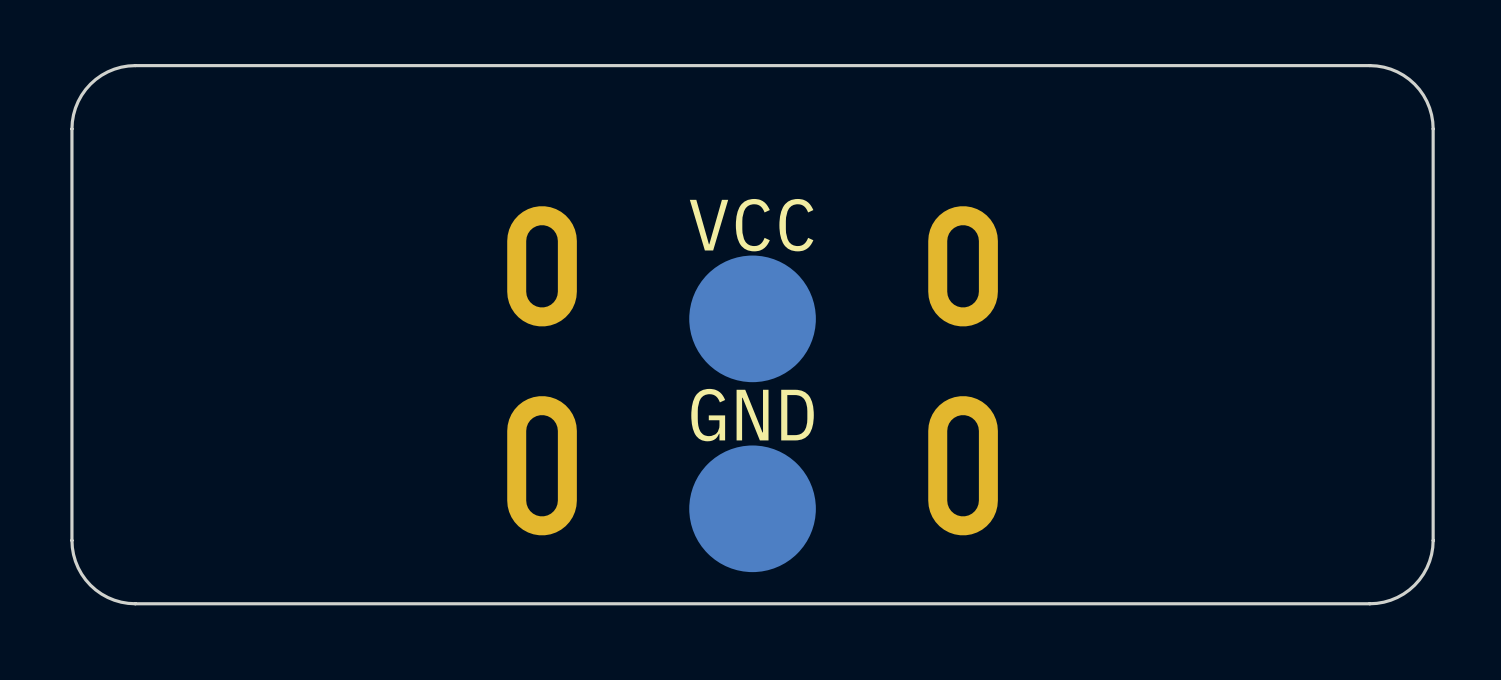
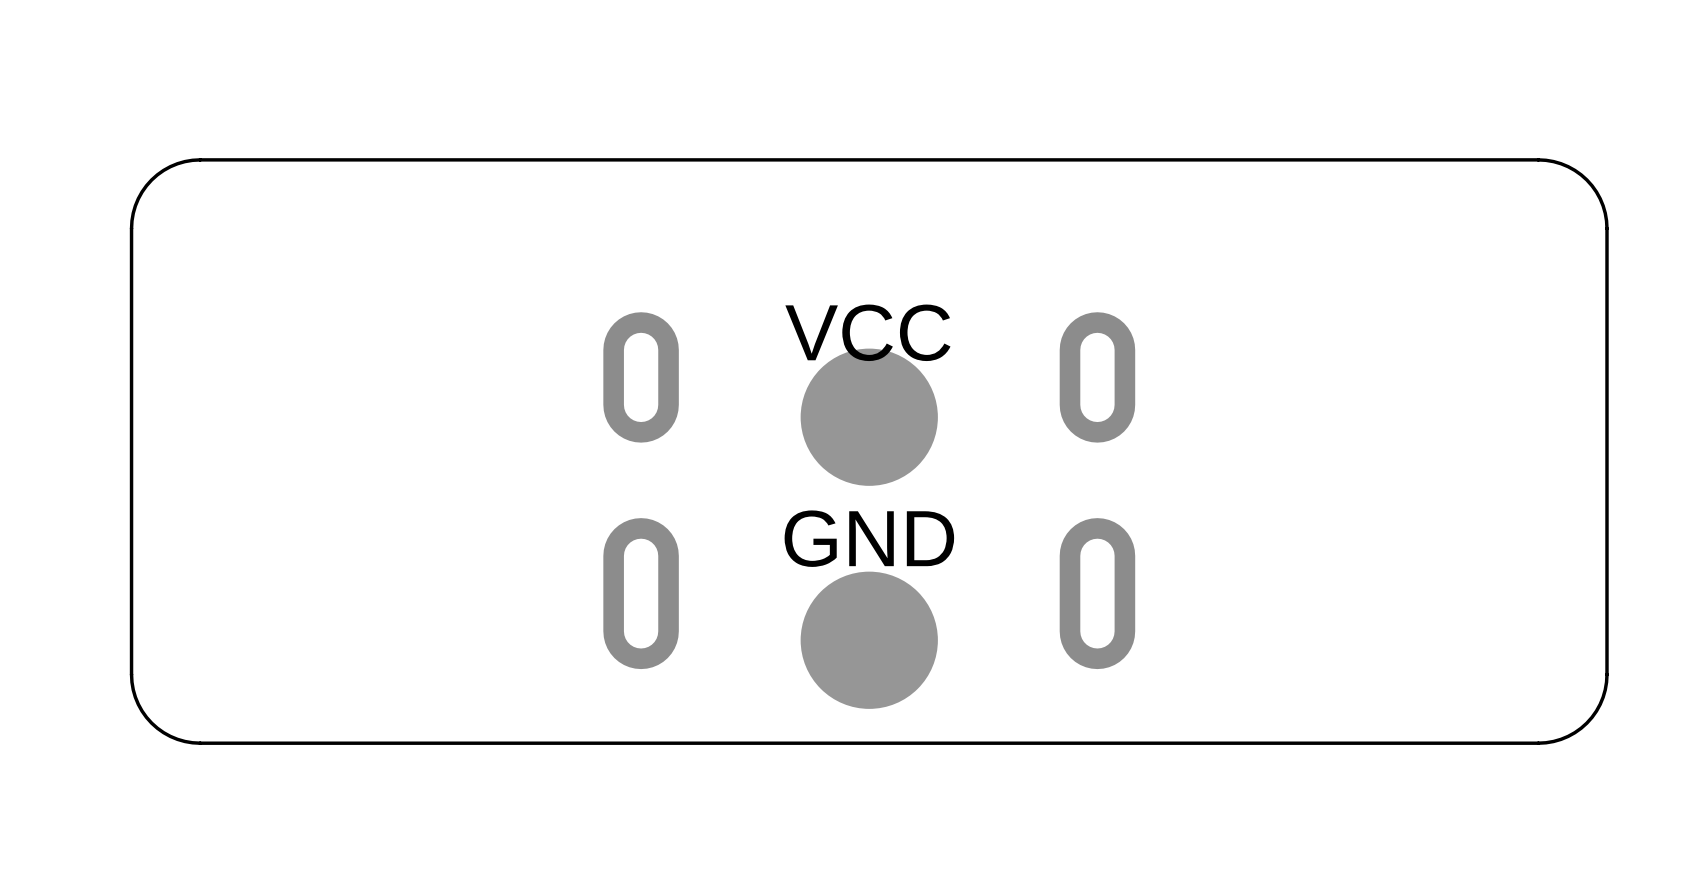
part position: (752, 318) -> (869, 417)

